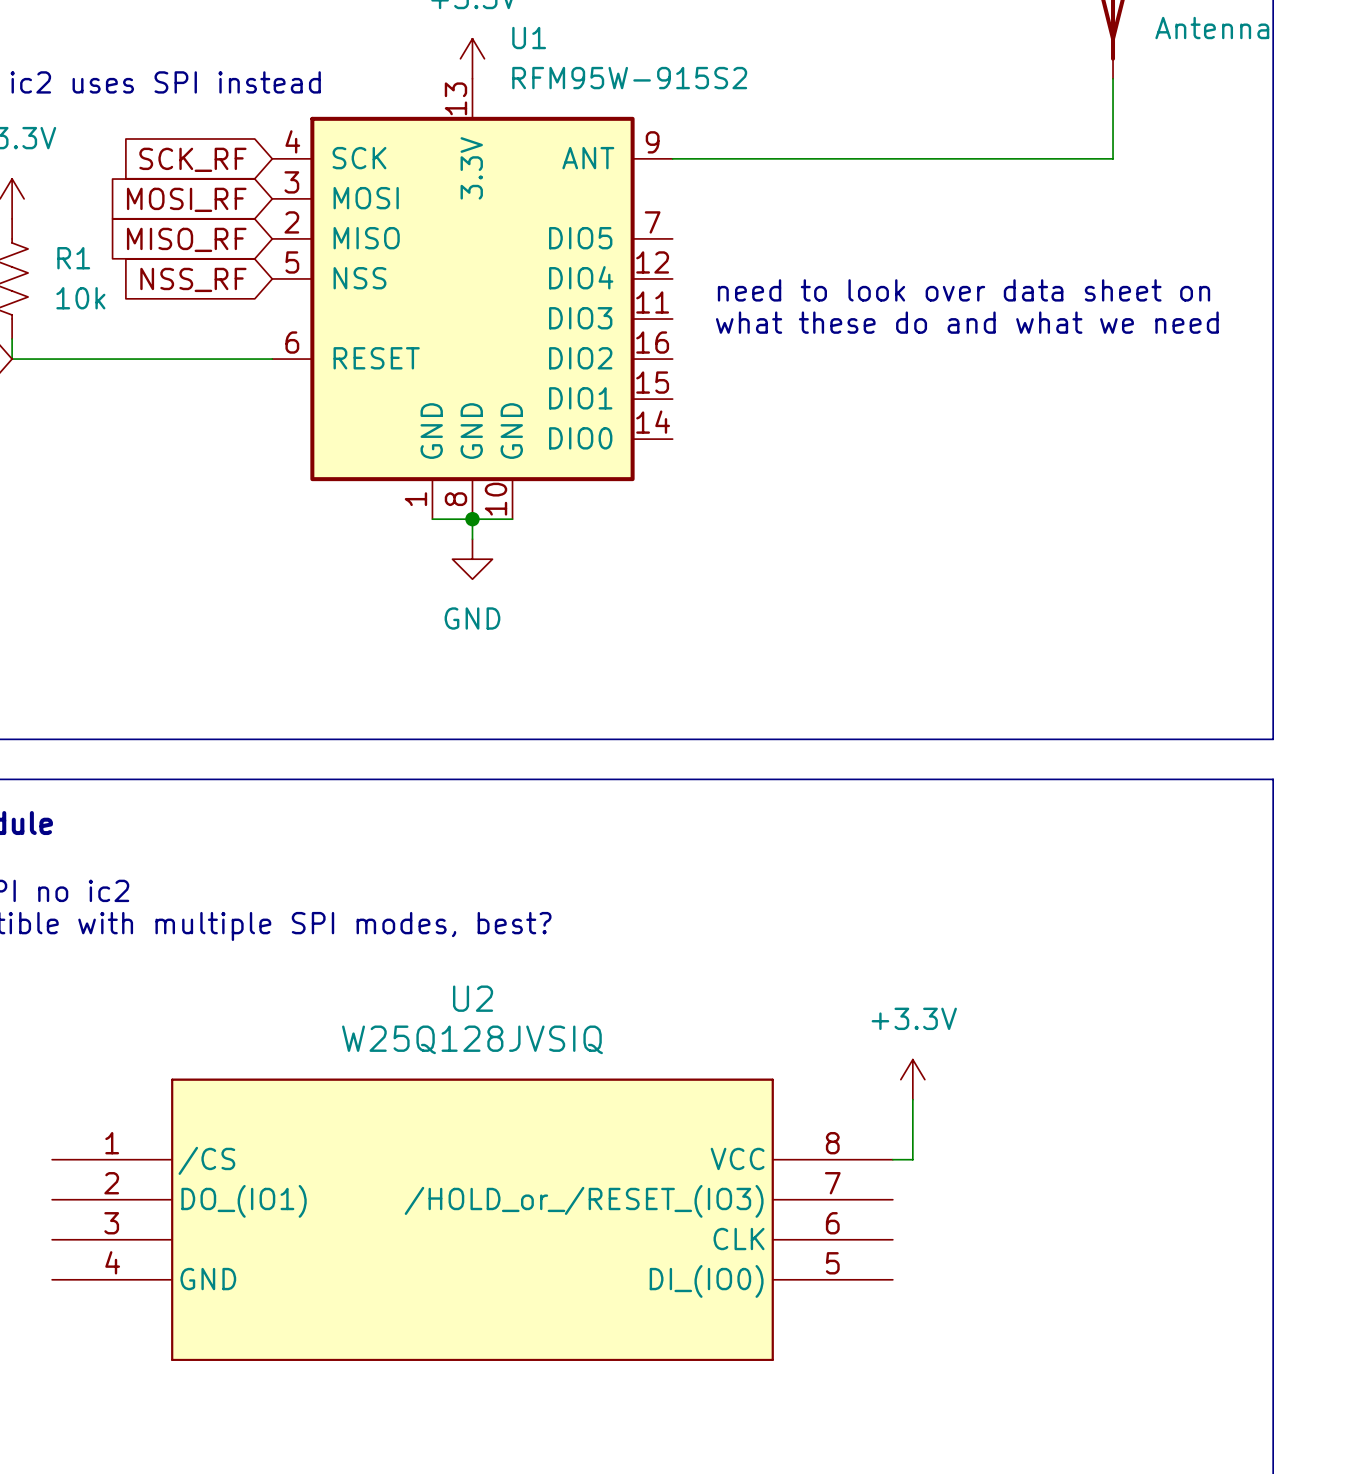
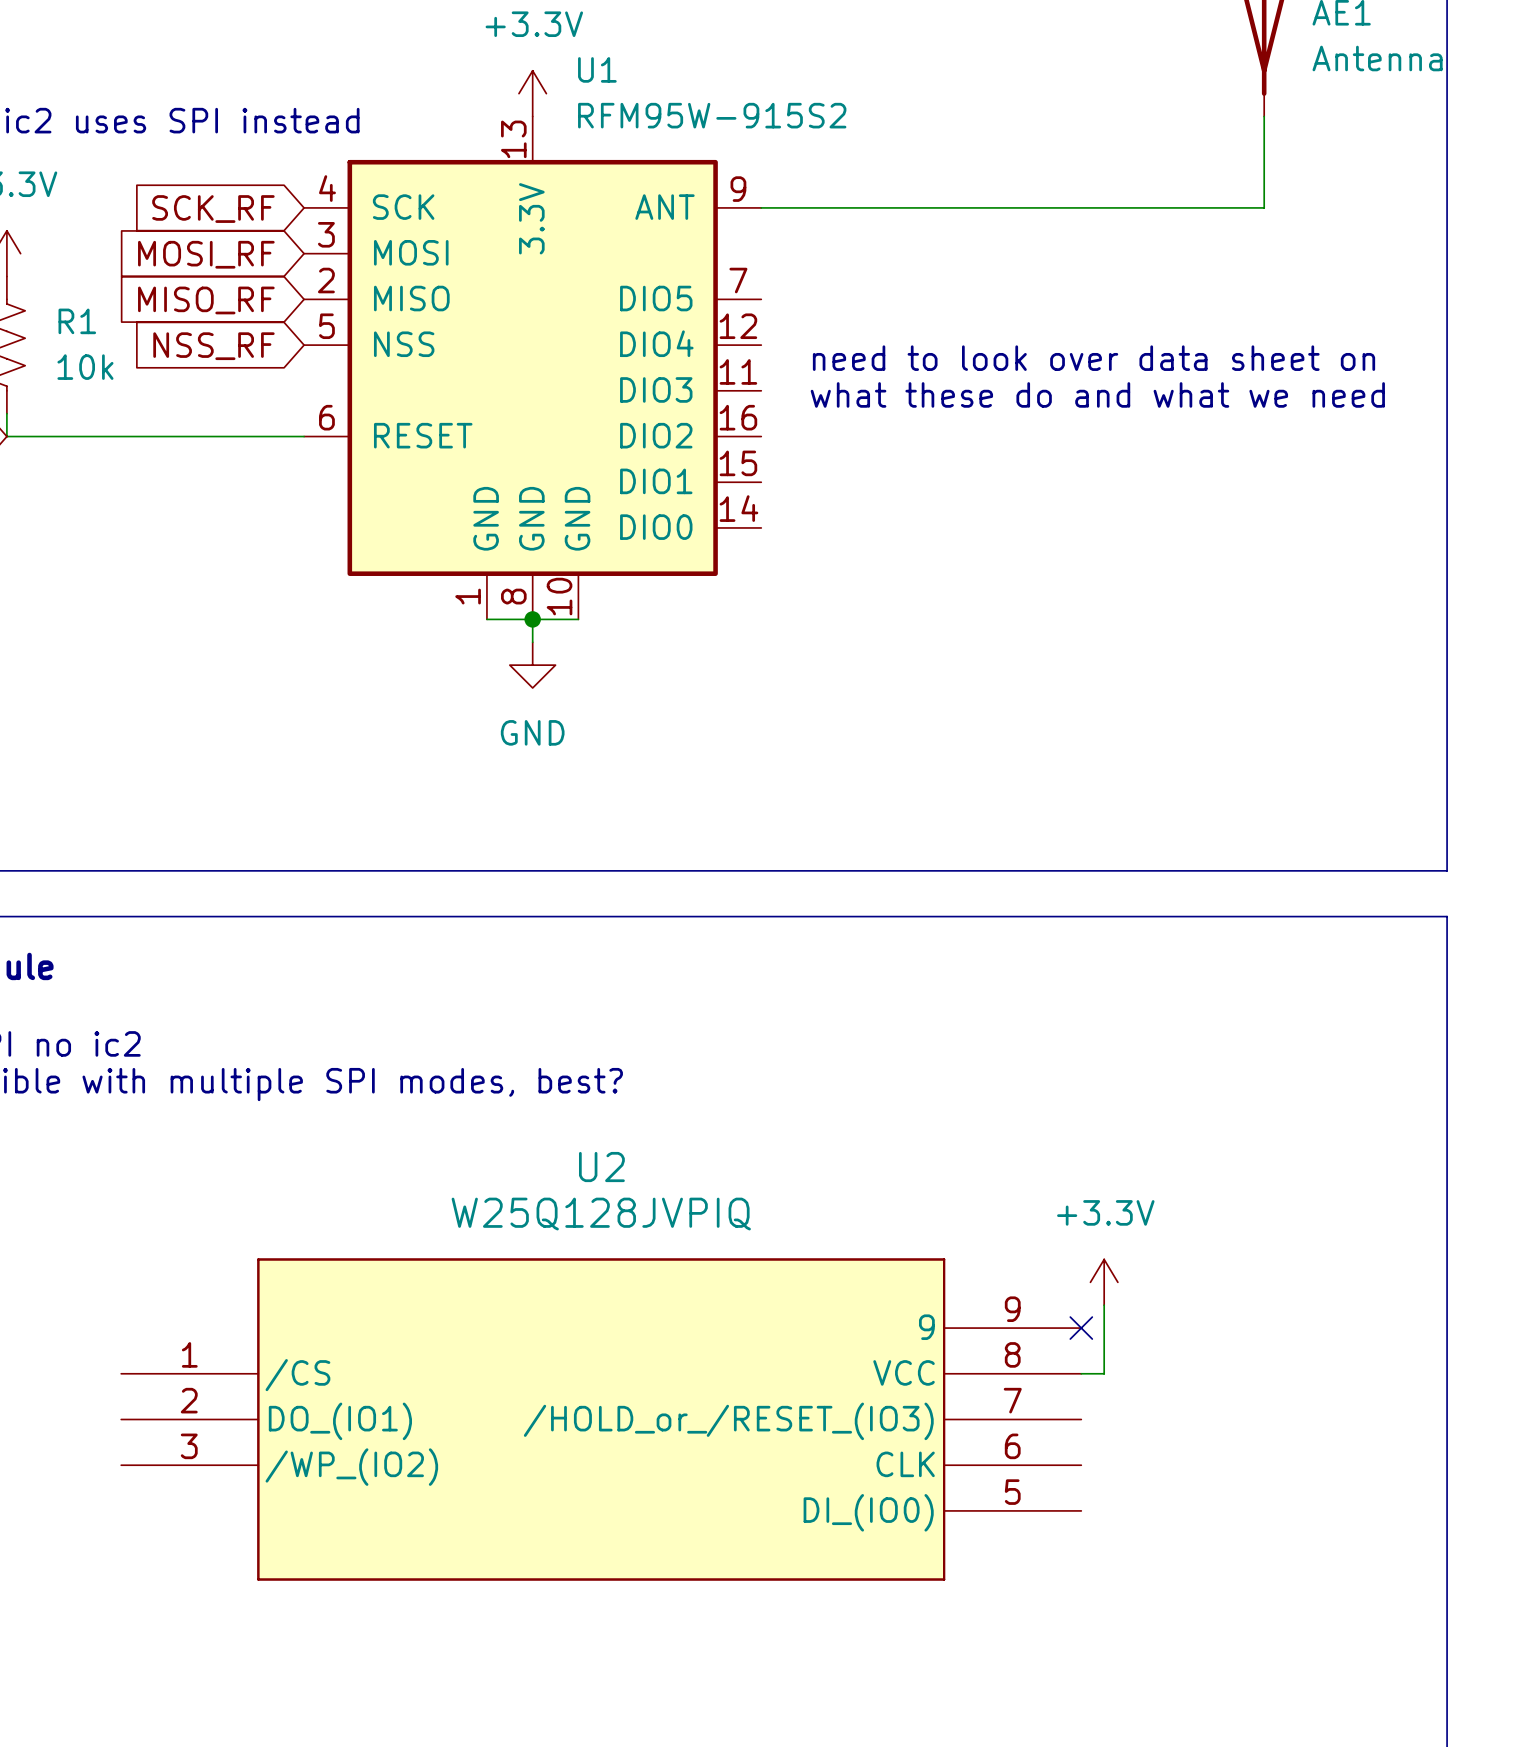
U2 value: W25Q128JVSIQ (472, 1039) -> W25Q128JVPIQ (601, 1214)
U2 symbol: [52, 1078, 893, 1361] -> [121, 1258, 1082, 1581]
power symbol position: +3.3V (912, 1079) -> +3.3V (1104, 1282)
wire: (912, 1099) (912, 1159) (892, 1159) -> (1104, 1305) (1104, 1373) (1081, 1373)
no-connect mark: none -> (1081, 1328)

